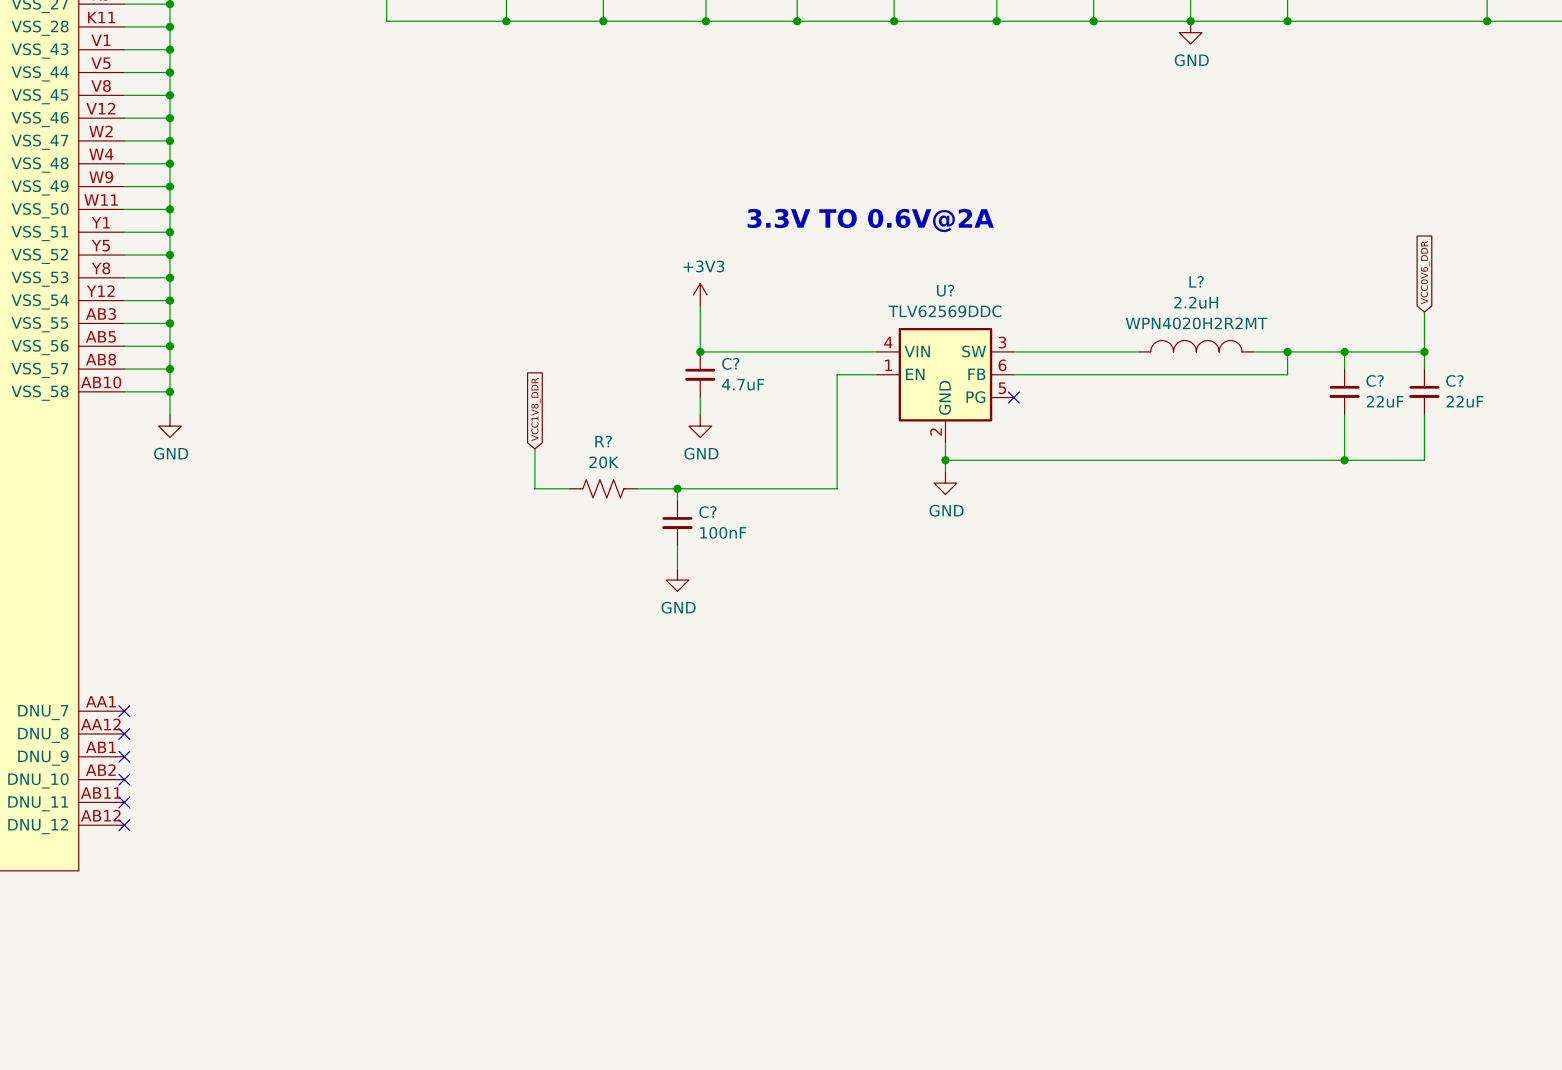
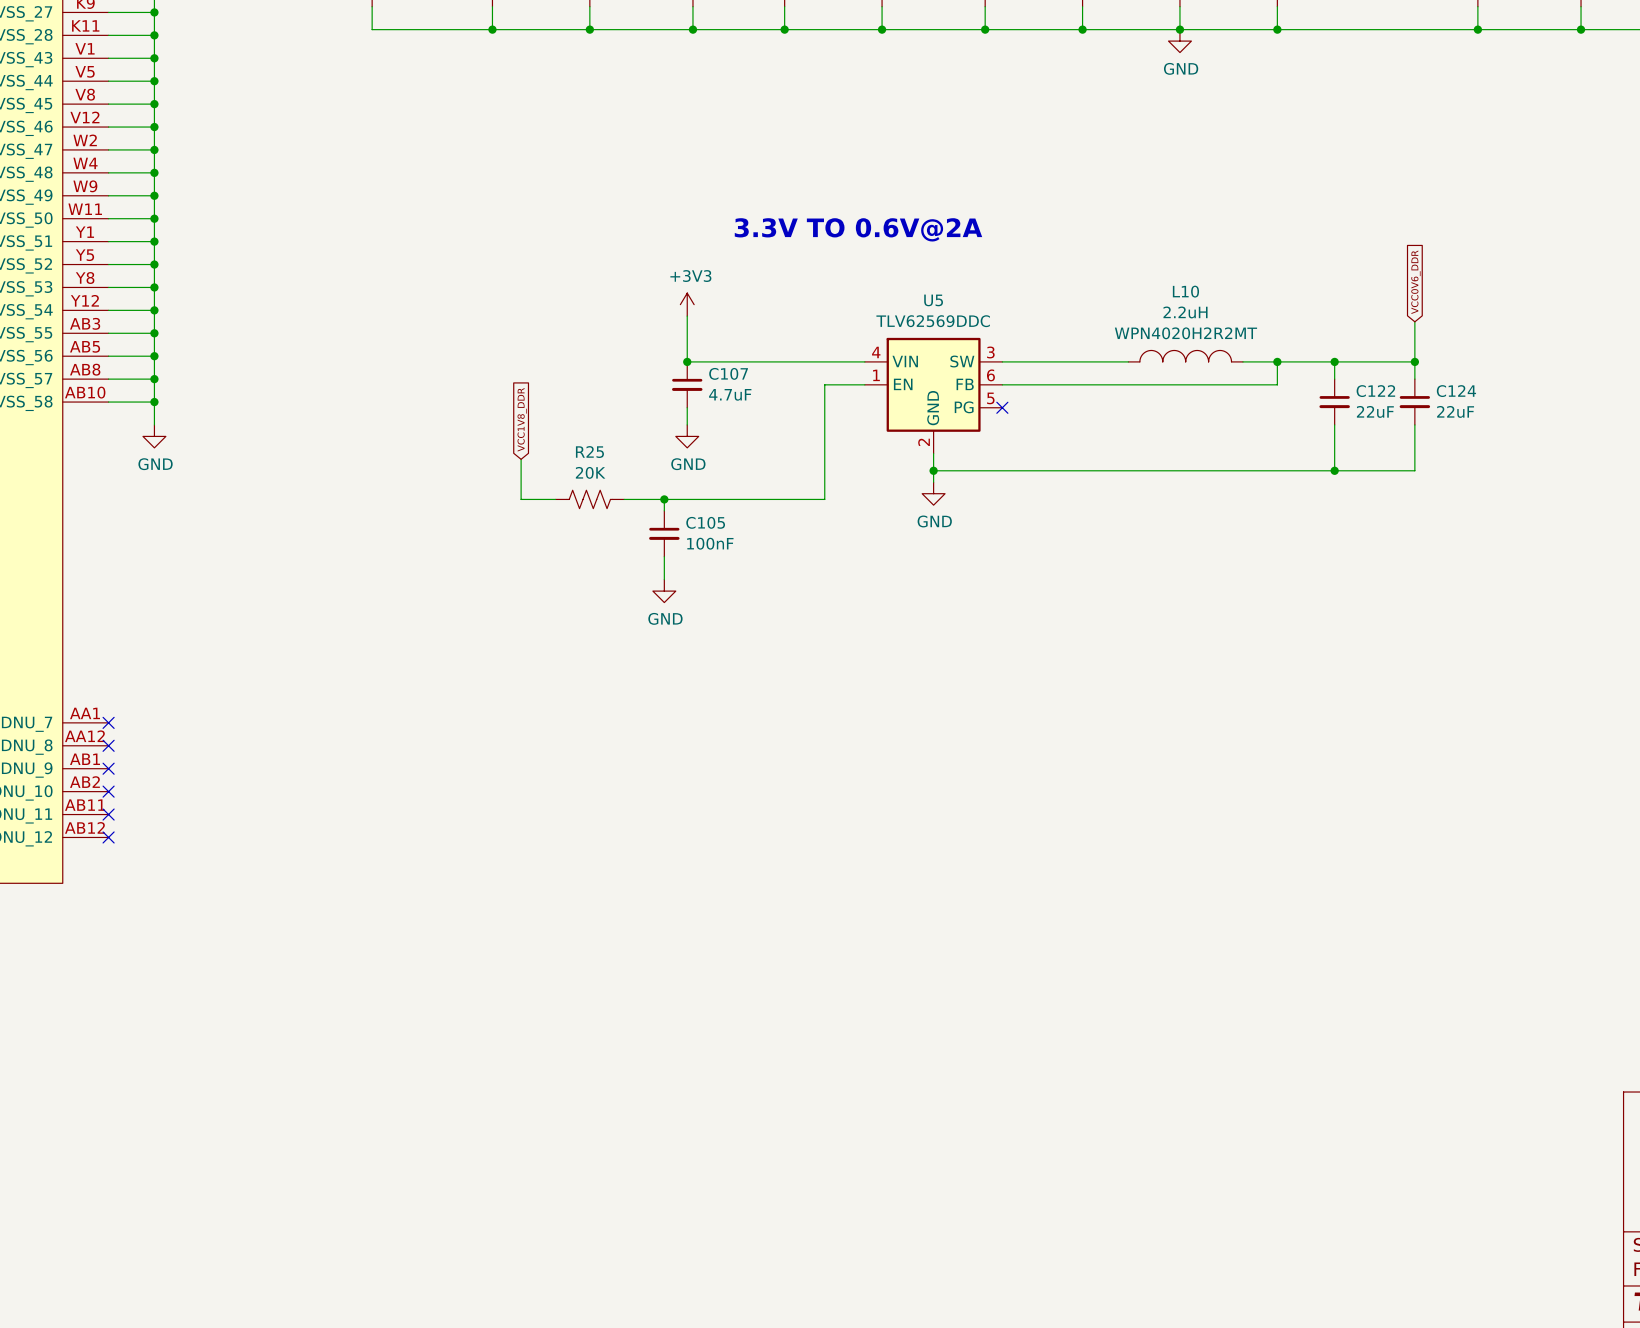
L? name: L? (1196, 281) -> L10 (1185, 291)
U? name: U? (945, 290) -> U5 (933, 300)
C? name: C? (730, 363) -> C107 (728, 373)
C? name: C? (1375, 380) -> C122 (1375, 391)
C? name: C? (1454, 380) -> C124 (1456, 391)
R? name: R? (603, 441) -> R25 (589, 452)
C? name: C? (707, 512) -> C105 (705, 522)

